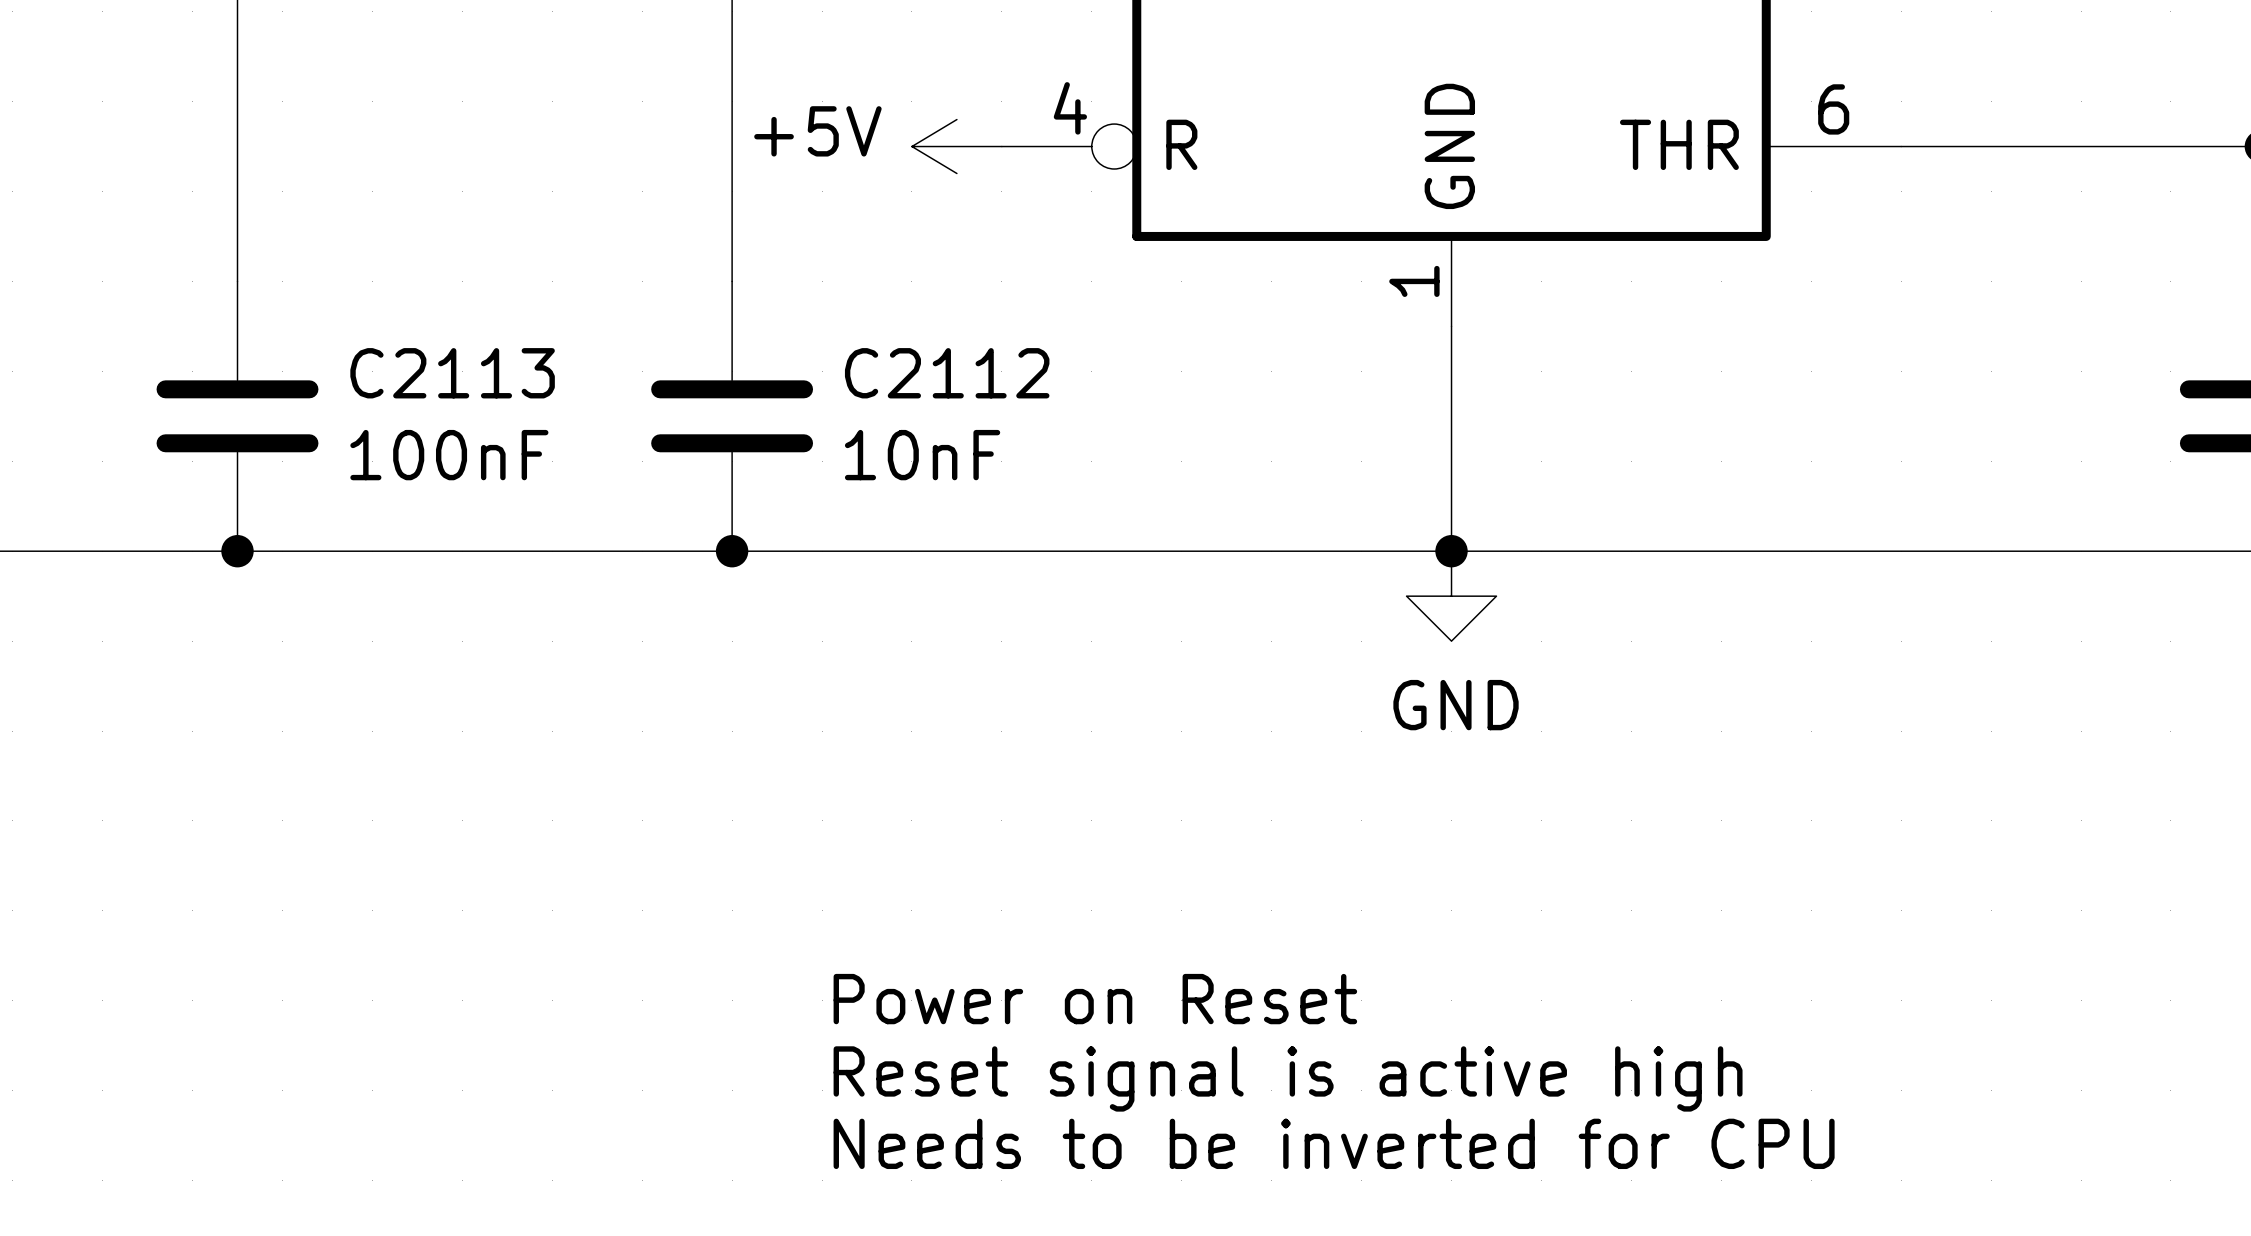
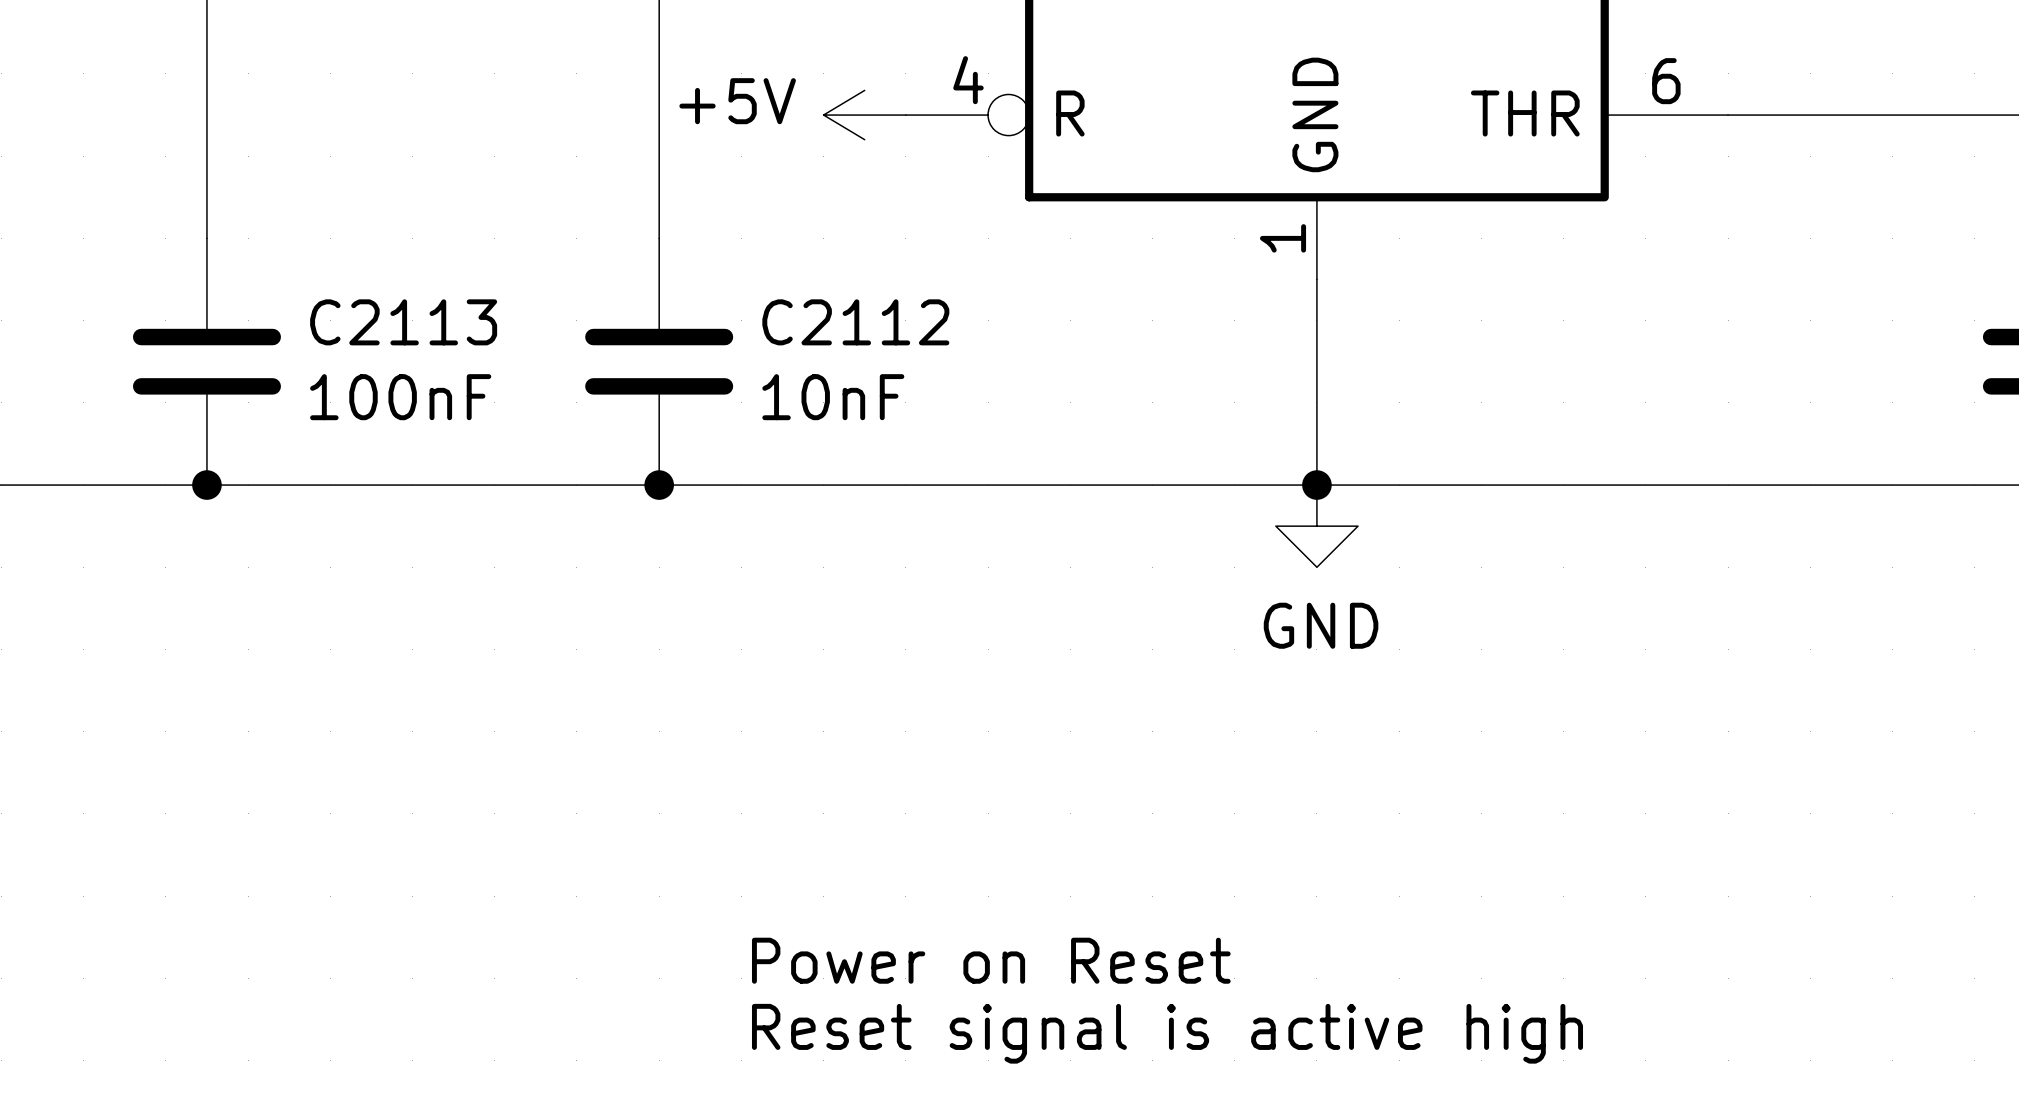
text: Power on Reset (1095, 999) -> none
text: Reset signal is active high (1288, 1078) -> Power on Reset (991, 960)
text: Needs to be inverted for CPU (1334, 1143) -> Reset signal is active high (1167, 1033)

